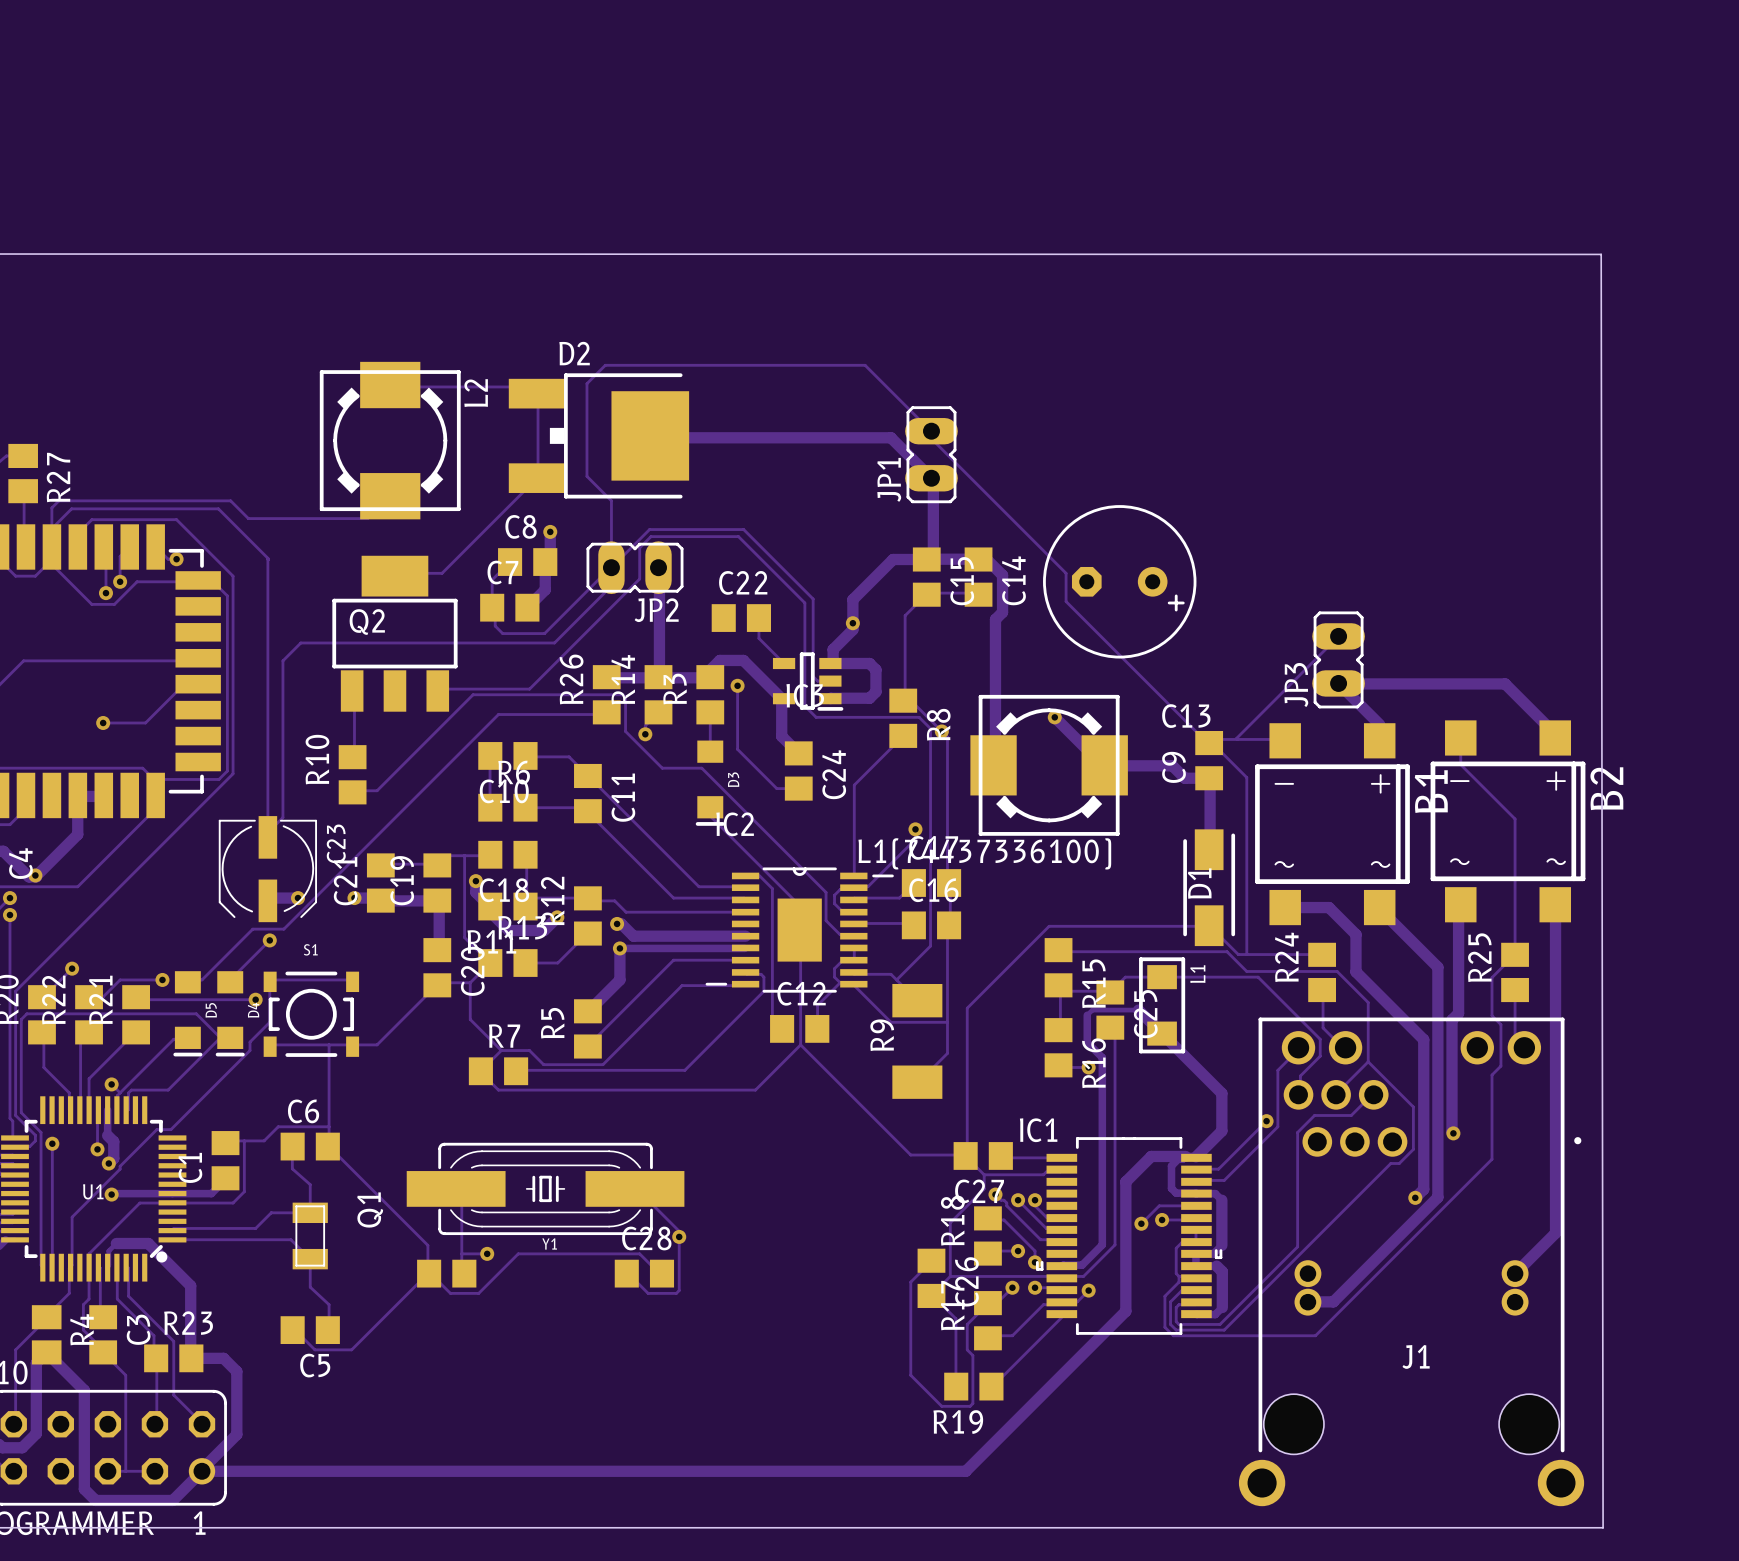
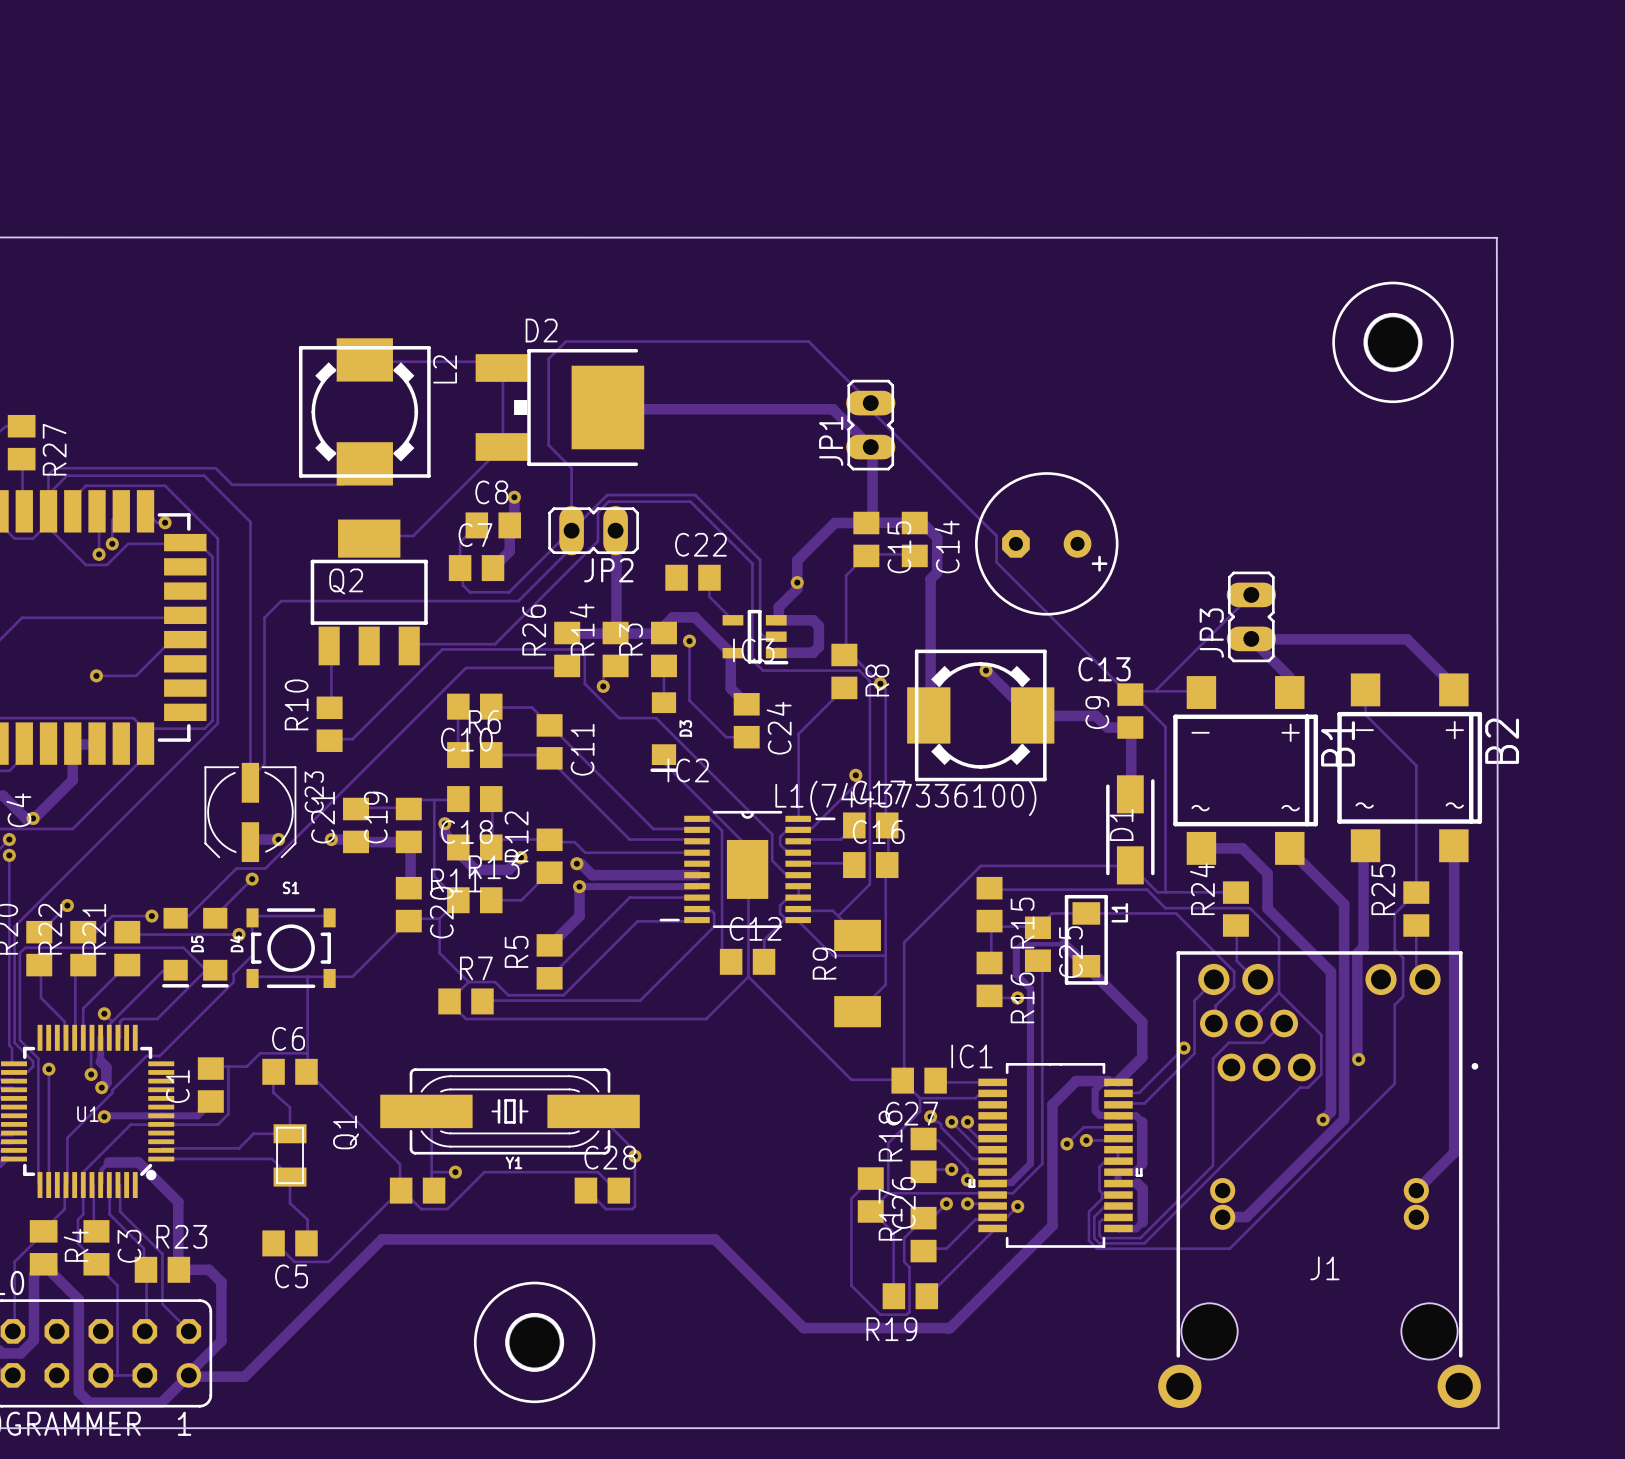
part: none -> (1392, 342)
track: (1016, 1420) (965, 1471) (202, 1471) -> (950, 1328) (803, 1328) (715, 1239) (381, 1239) (244, 1376) (188, 1375)
part: none -> (534, 1342)

